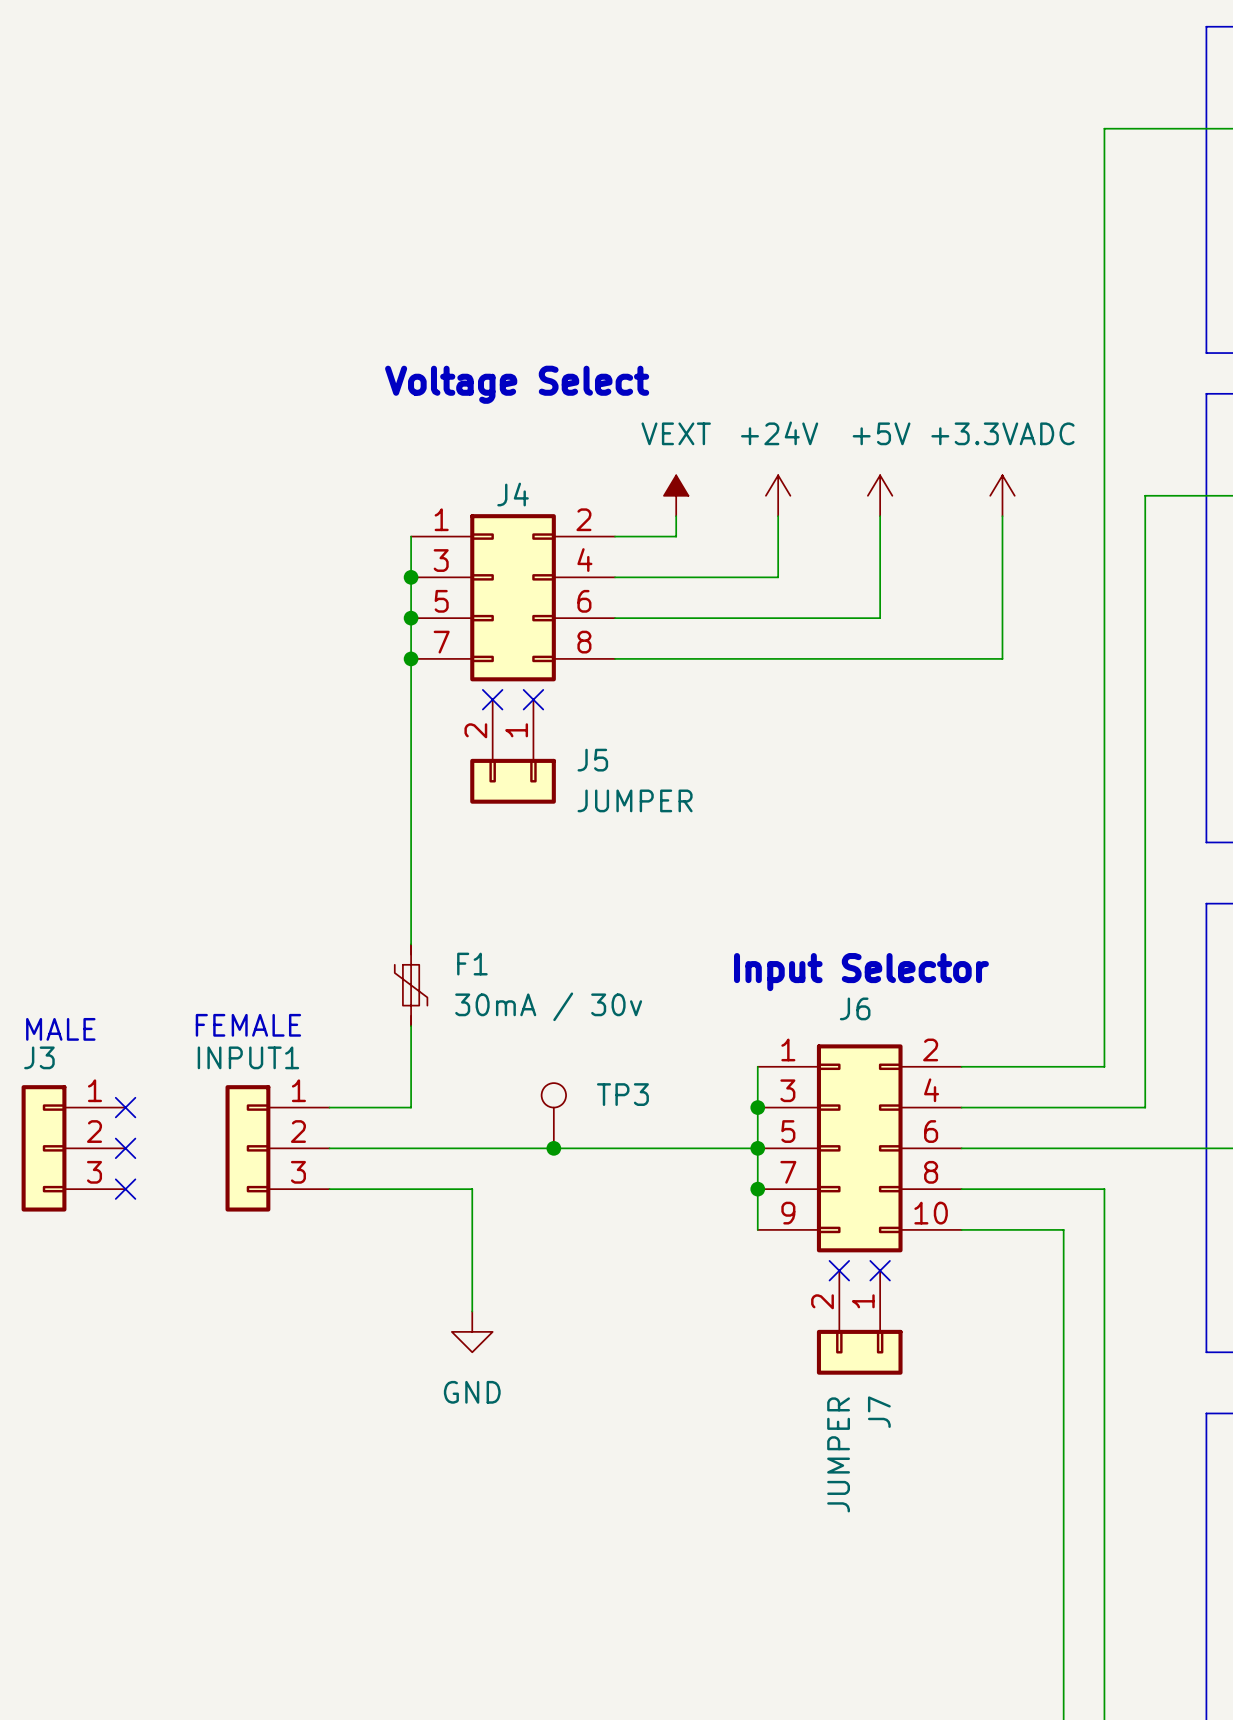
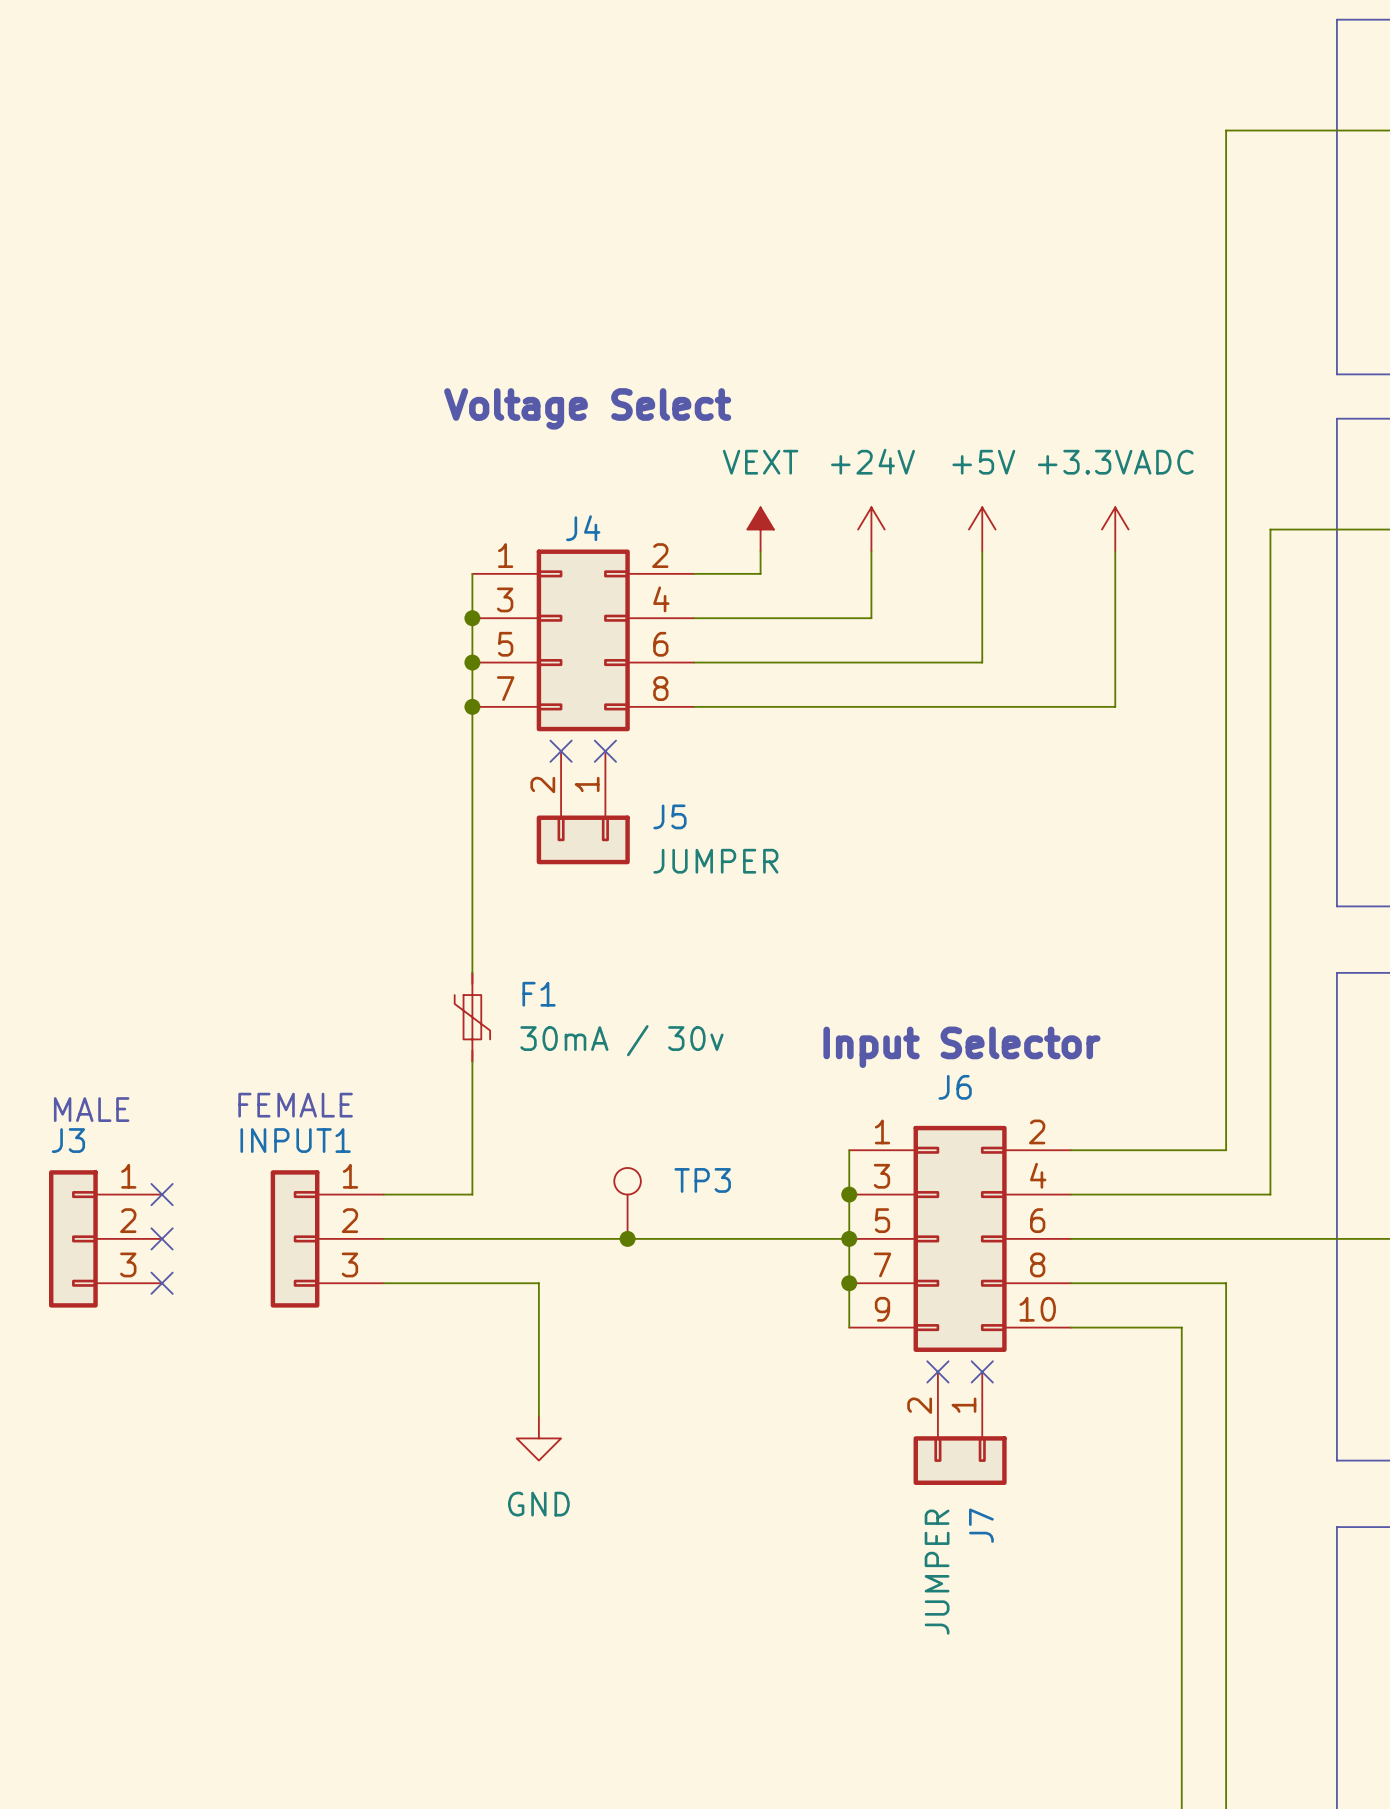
F1 position: (411, 985) -> (472, 1017)

